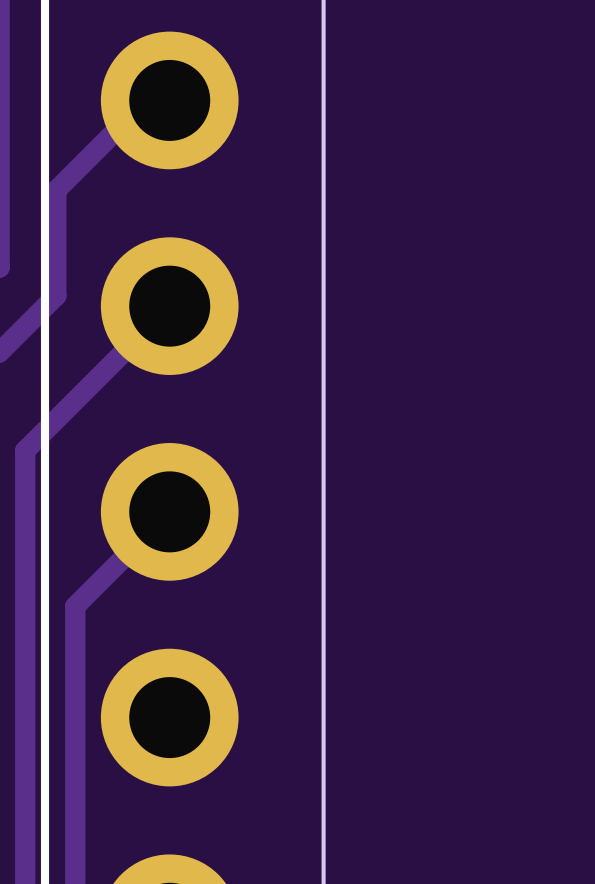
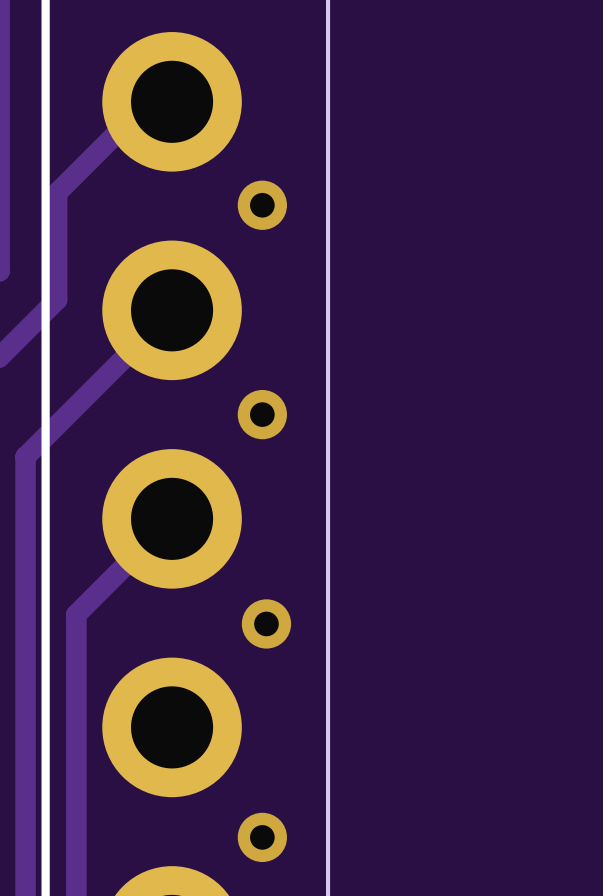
via: none -> (262, 205)
via: none -> (262, 414)
via: none -> (266, 623)
via: none -> (262, 837)

